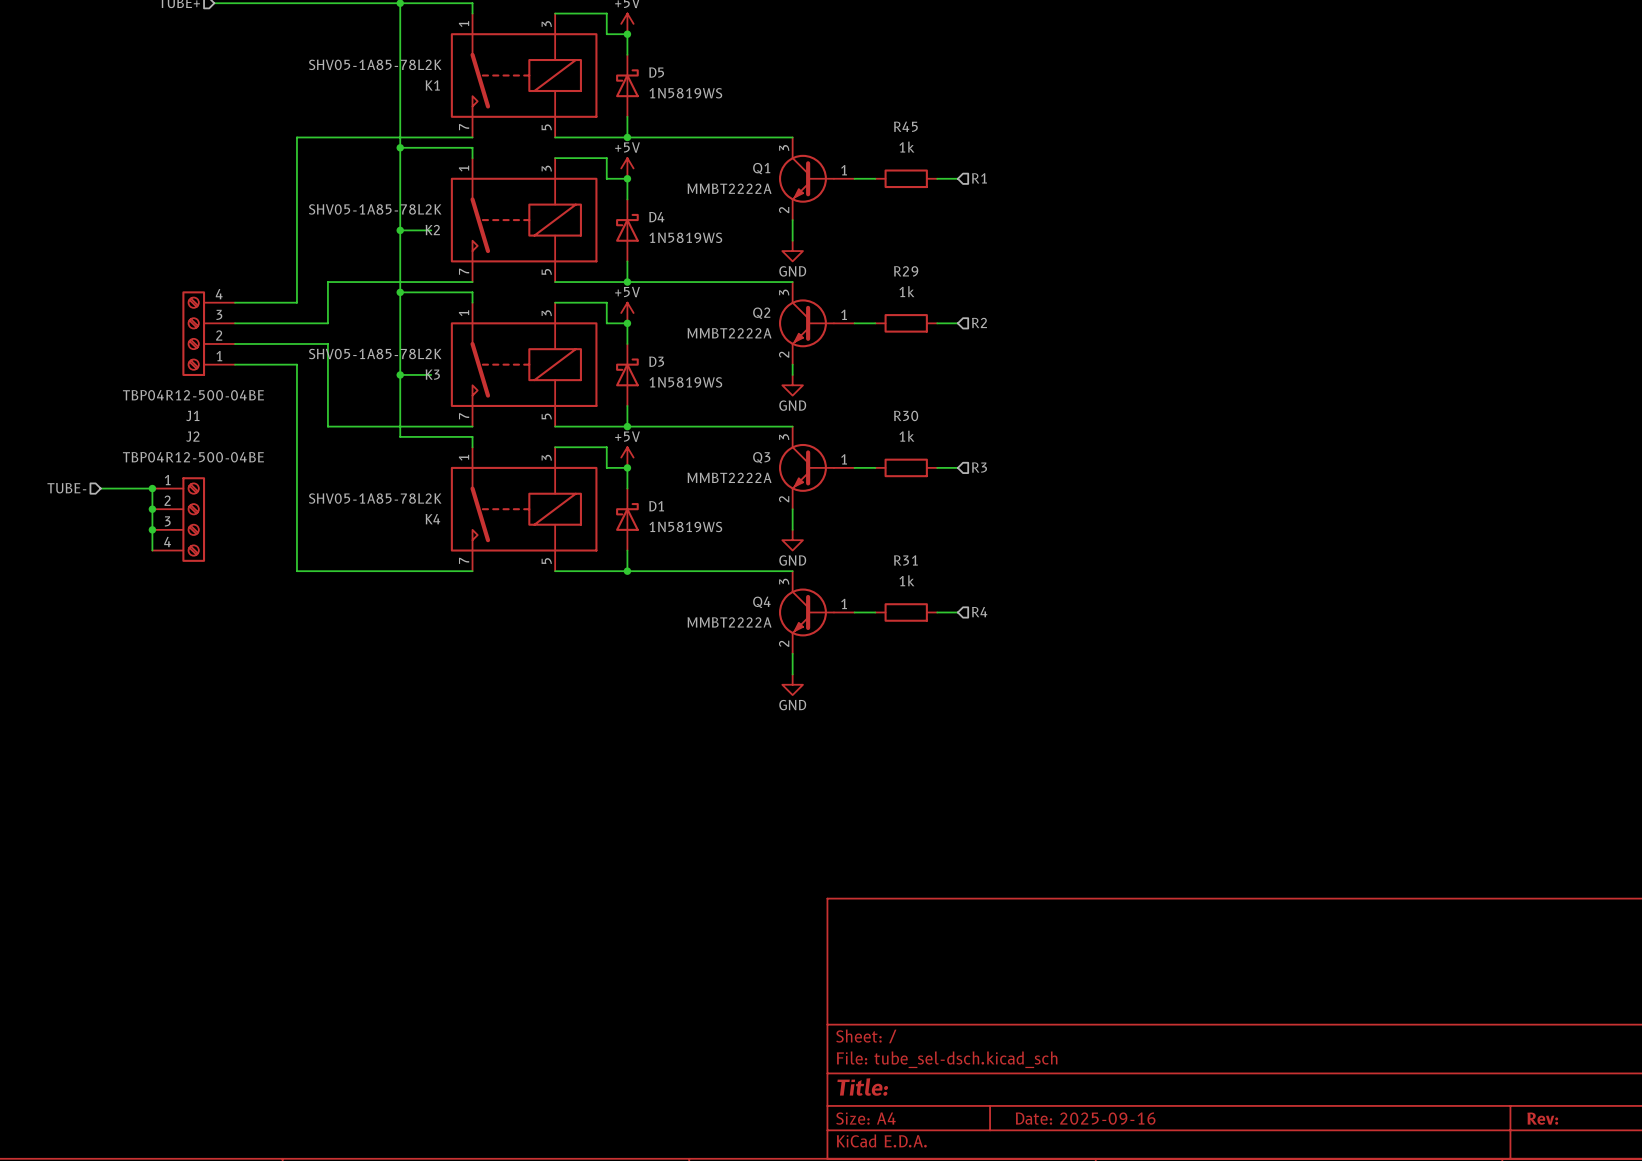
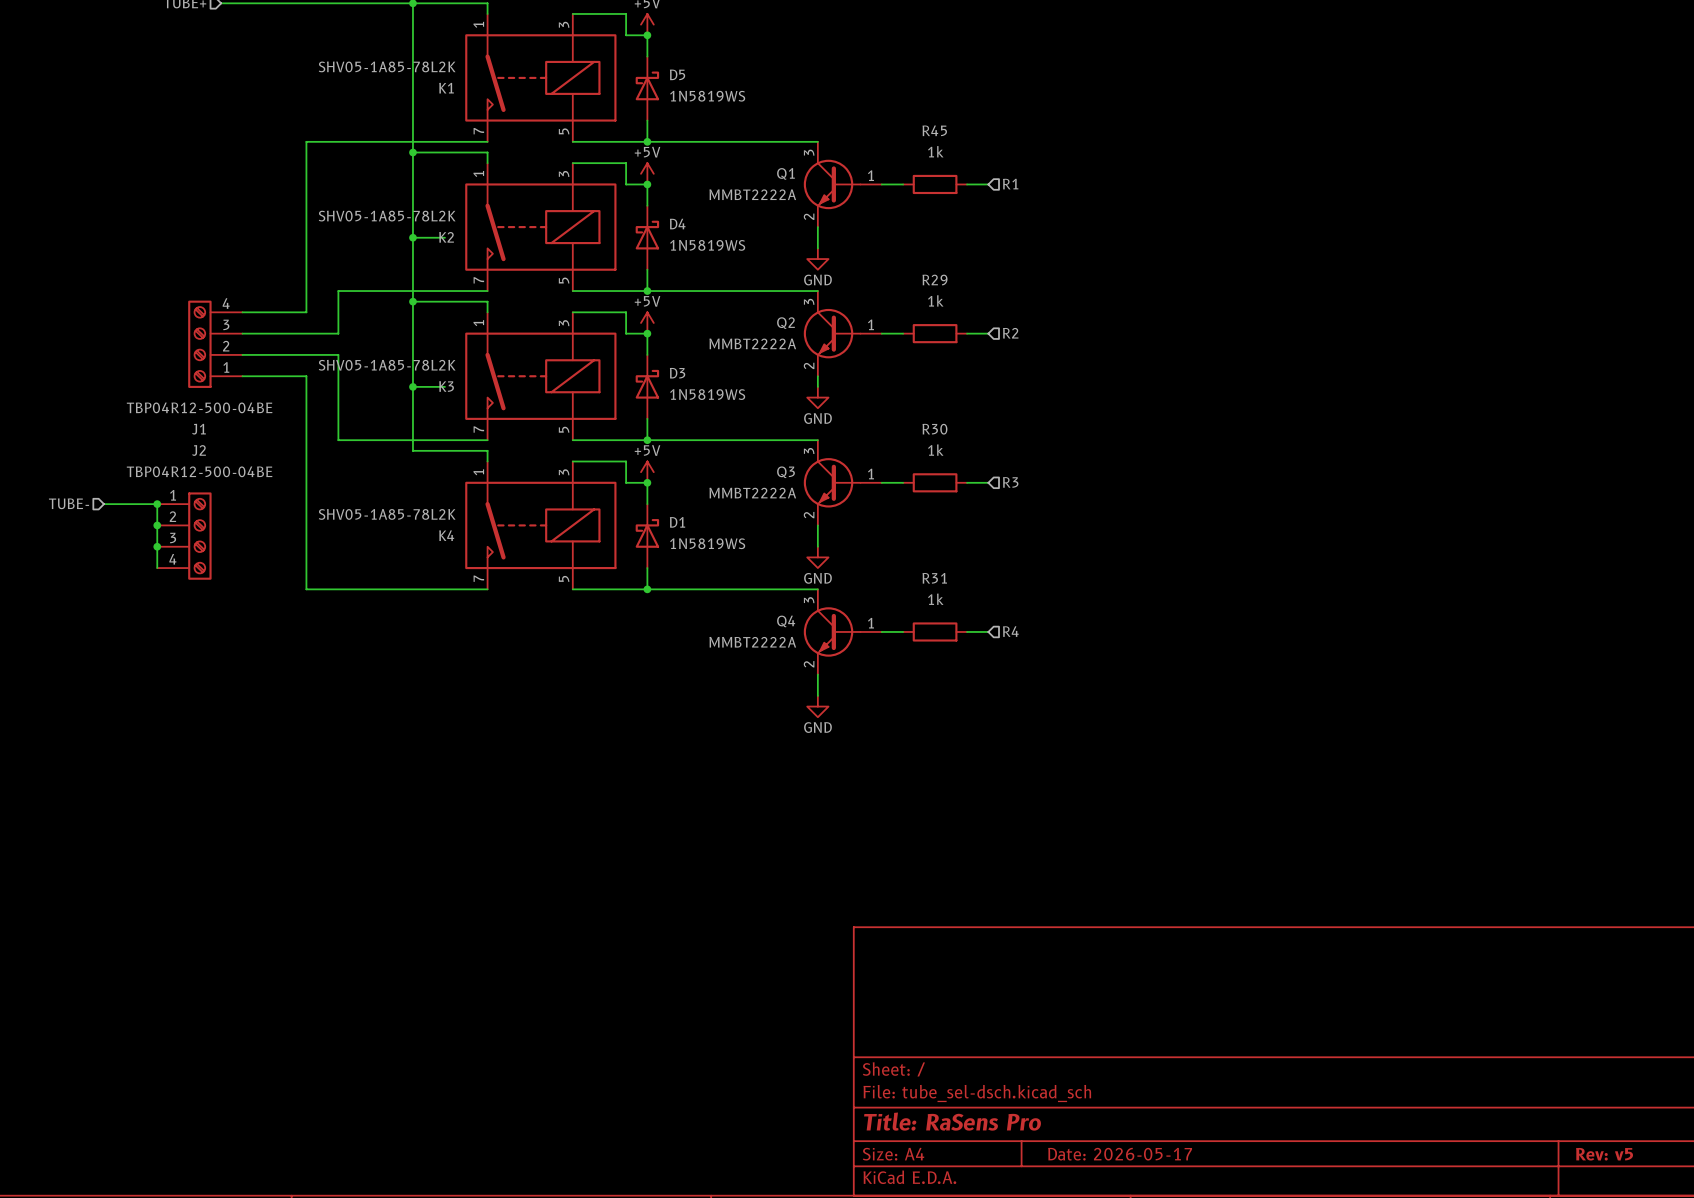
title block: Title: (862, 1086) -> Title: RaSens Pro (952, 1121)
title block: Date: 2025-09-16 (1085, 1118) -> Date: 2026-05-17 (1120, 1154)
title block: Rev: (1542, 1118) -> Rev: v5 (1604, 1154)

